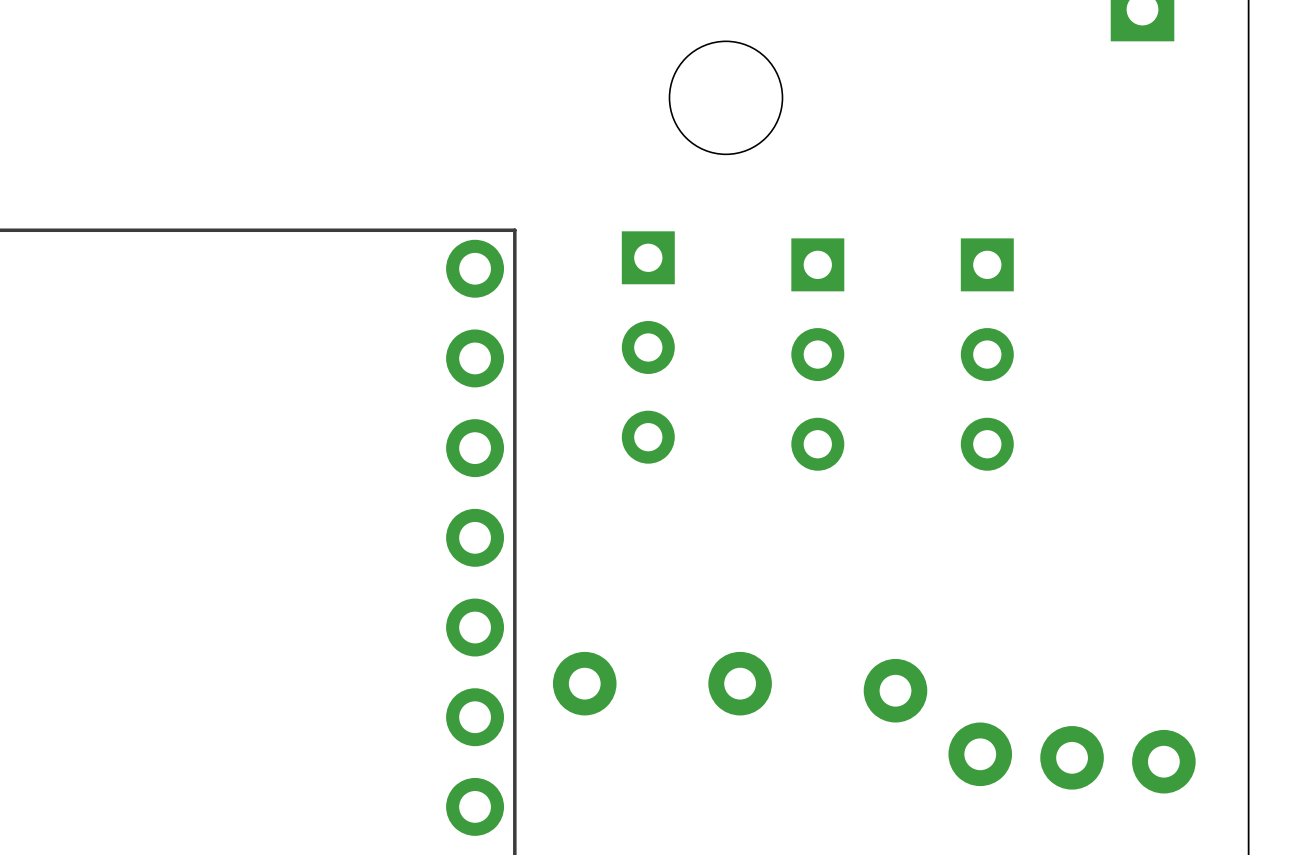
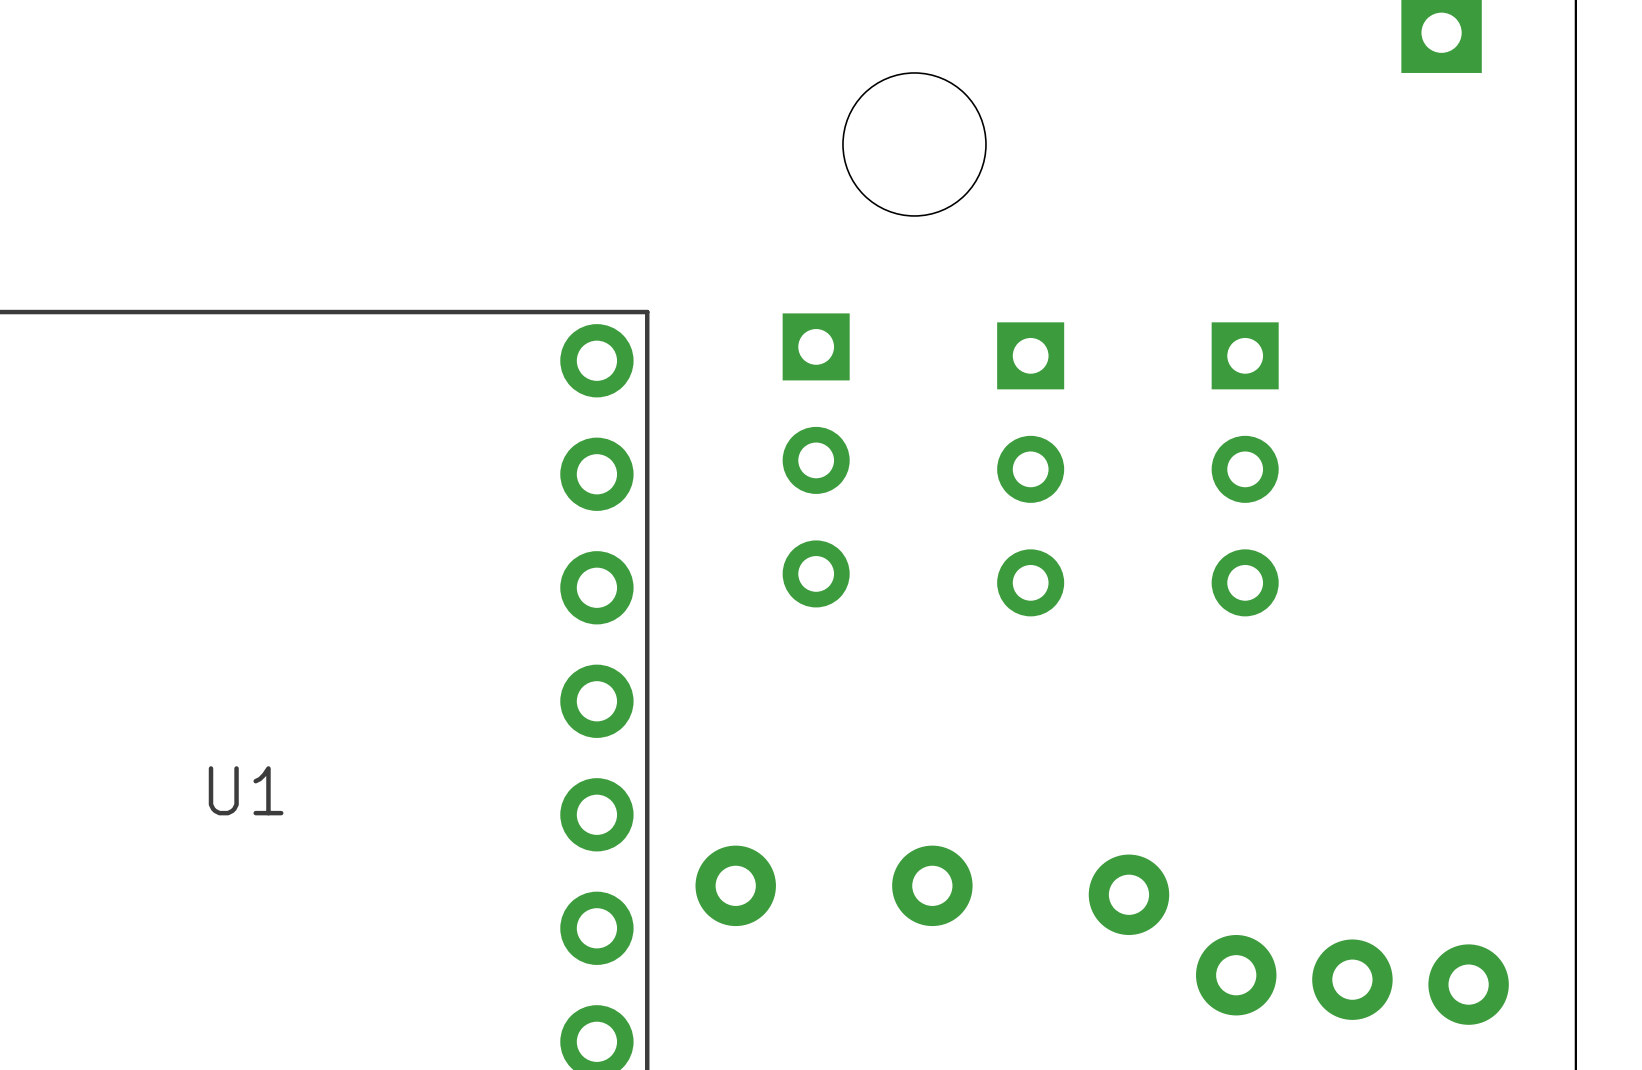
U1 name: none -> U1 (246, 790)

